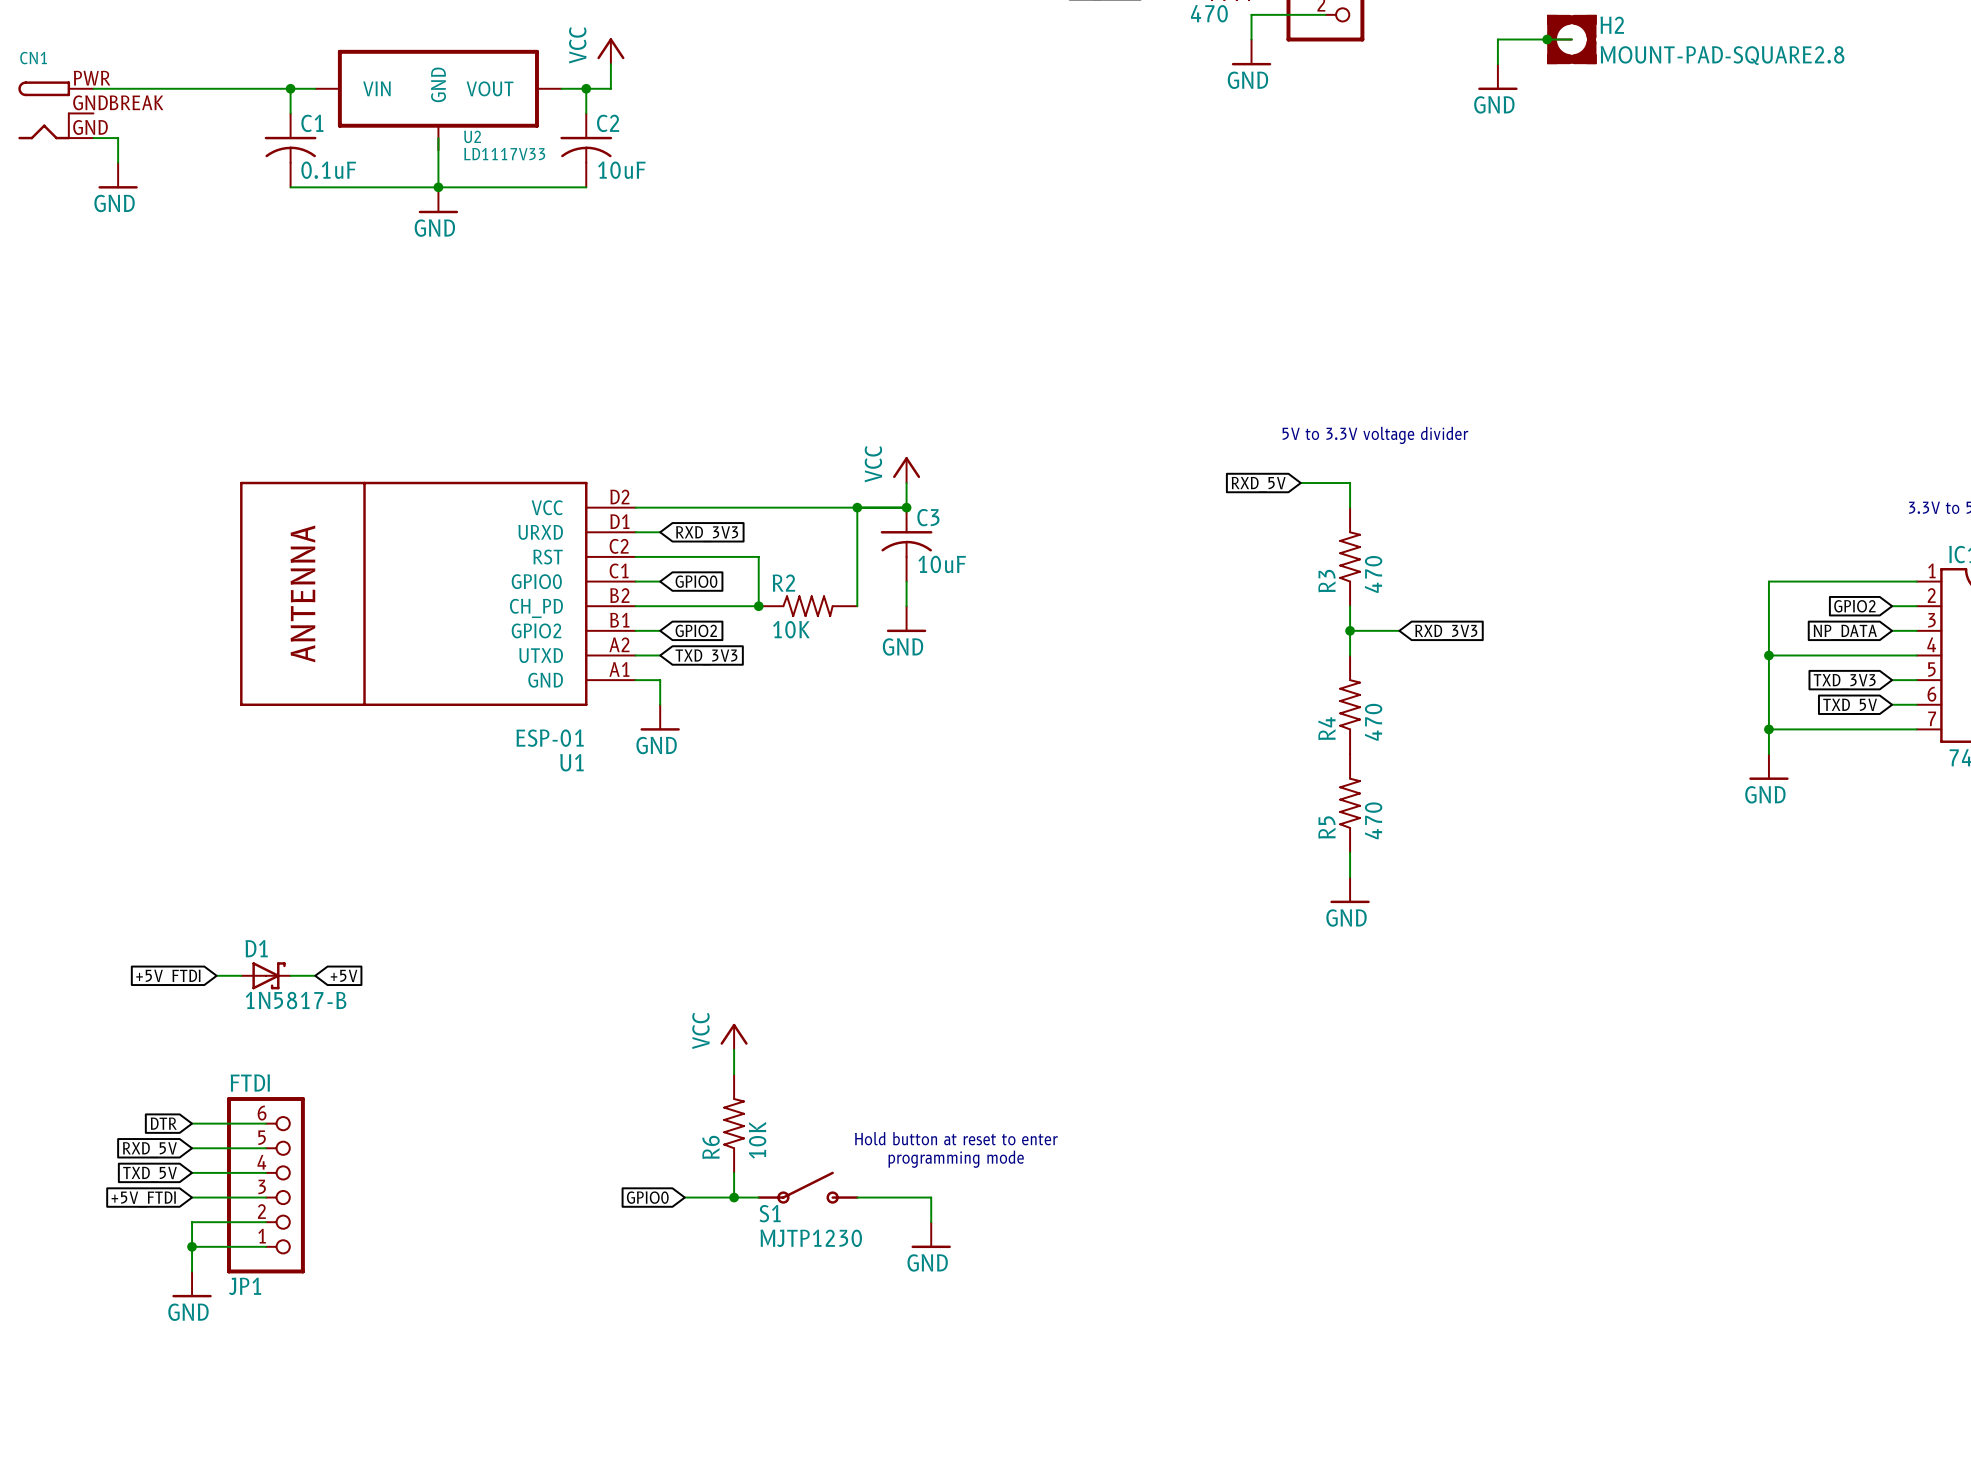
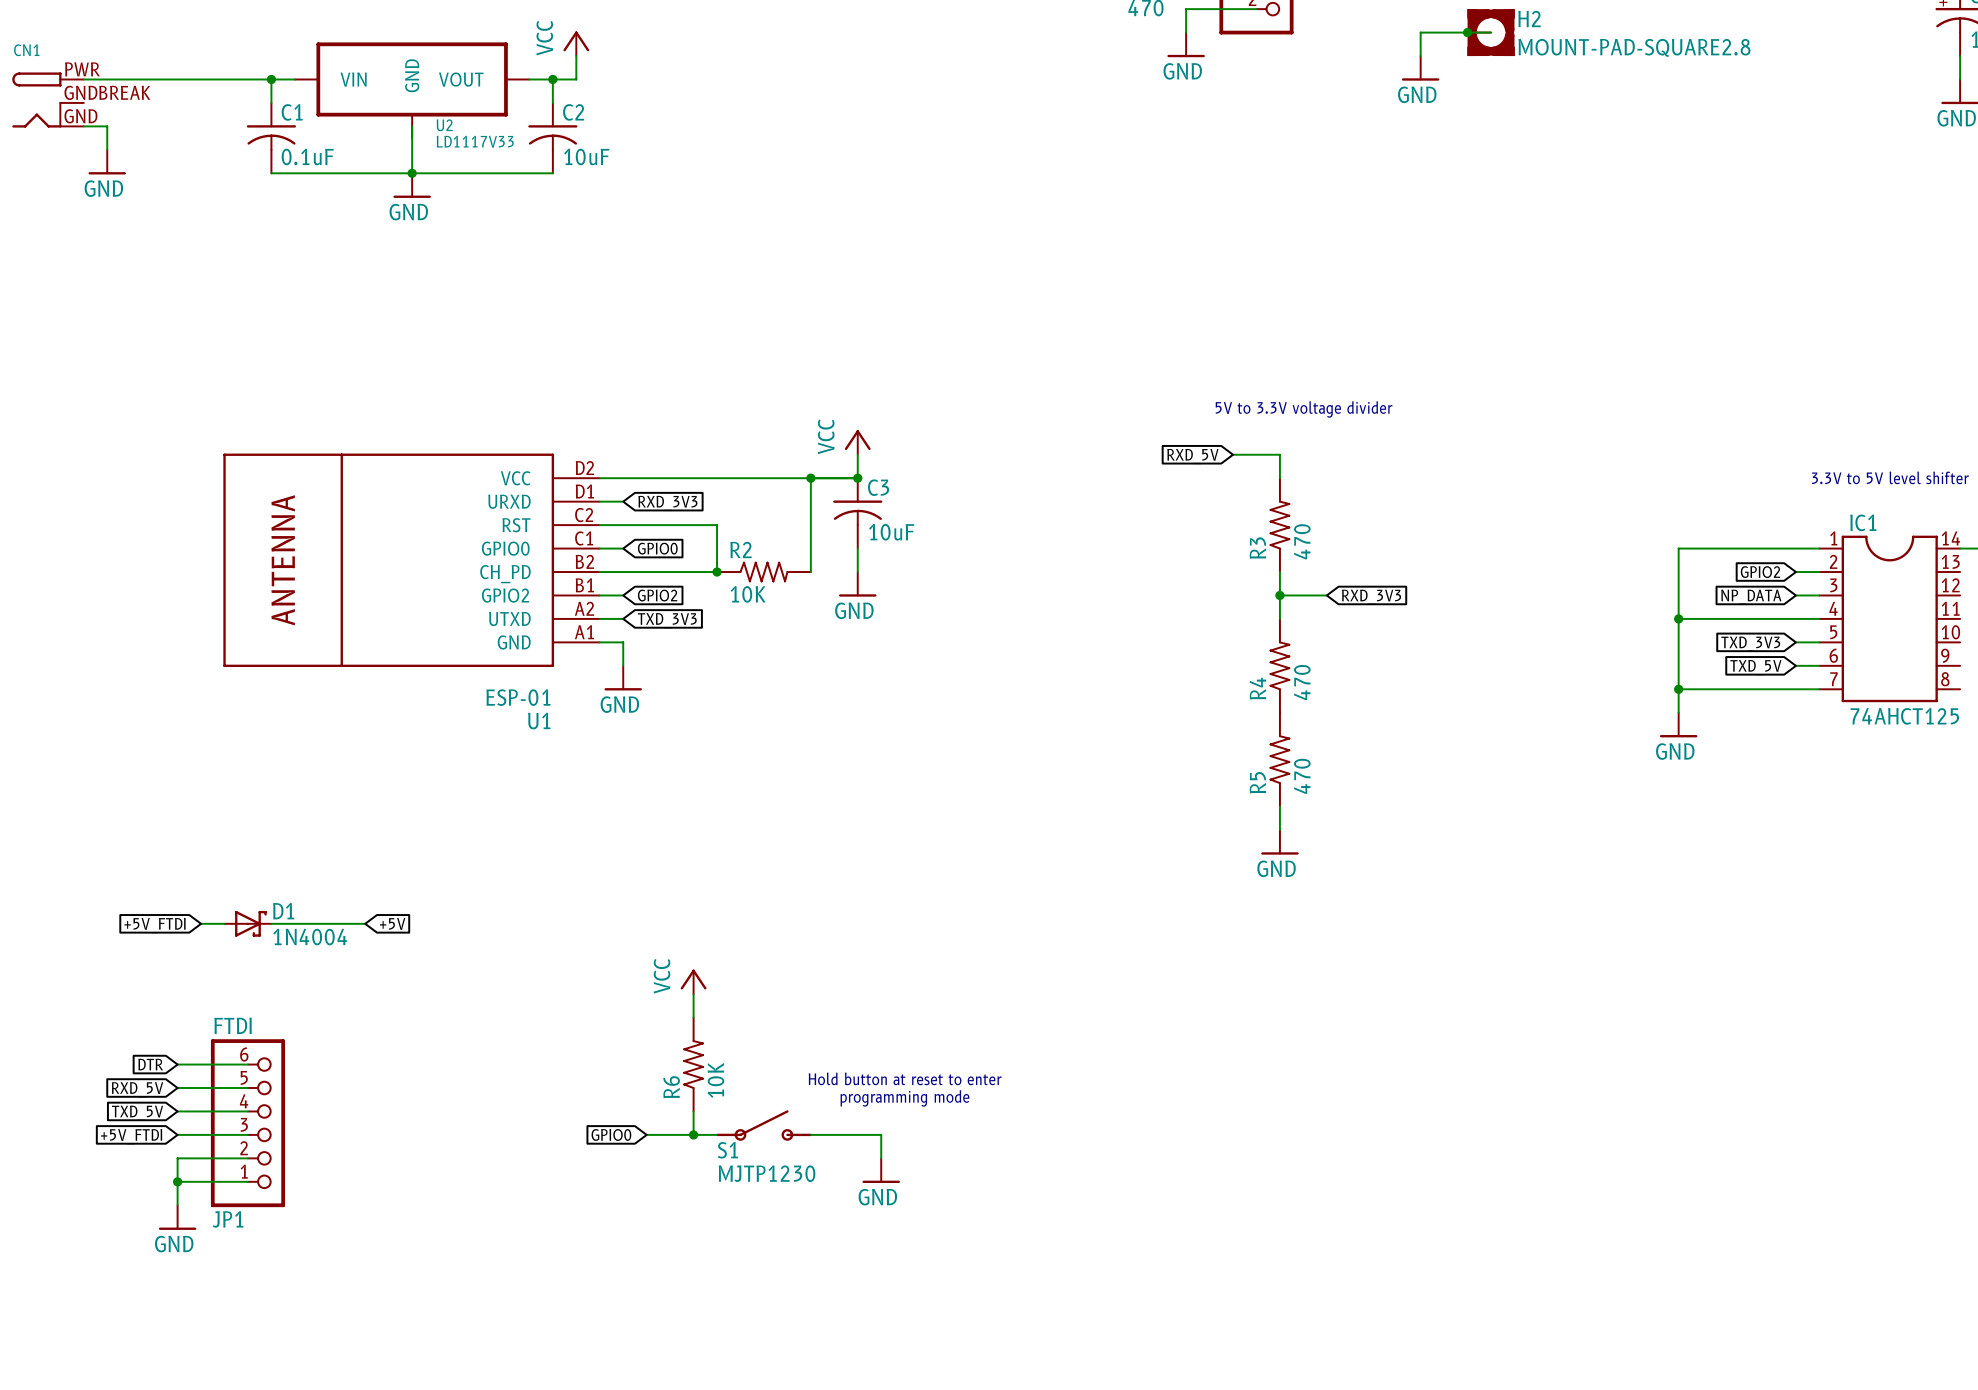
D1 name position: D1 (256, 948) -> D1 (283, 911)
wire: none -> (294, 923) (365, 923)
global label position: +5V (344, 975) -> +5V (392, 923)
D1 value: 1N5817-B (296, 1000) -> 1N4004 (310, 937)

